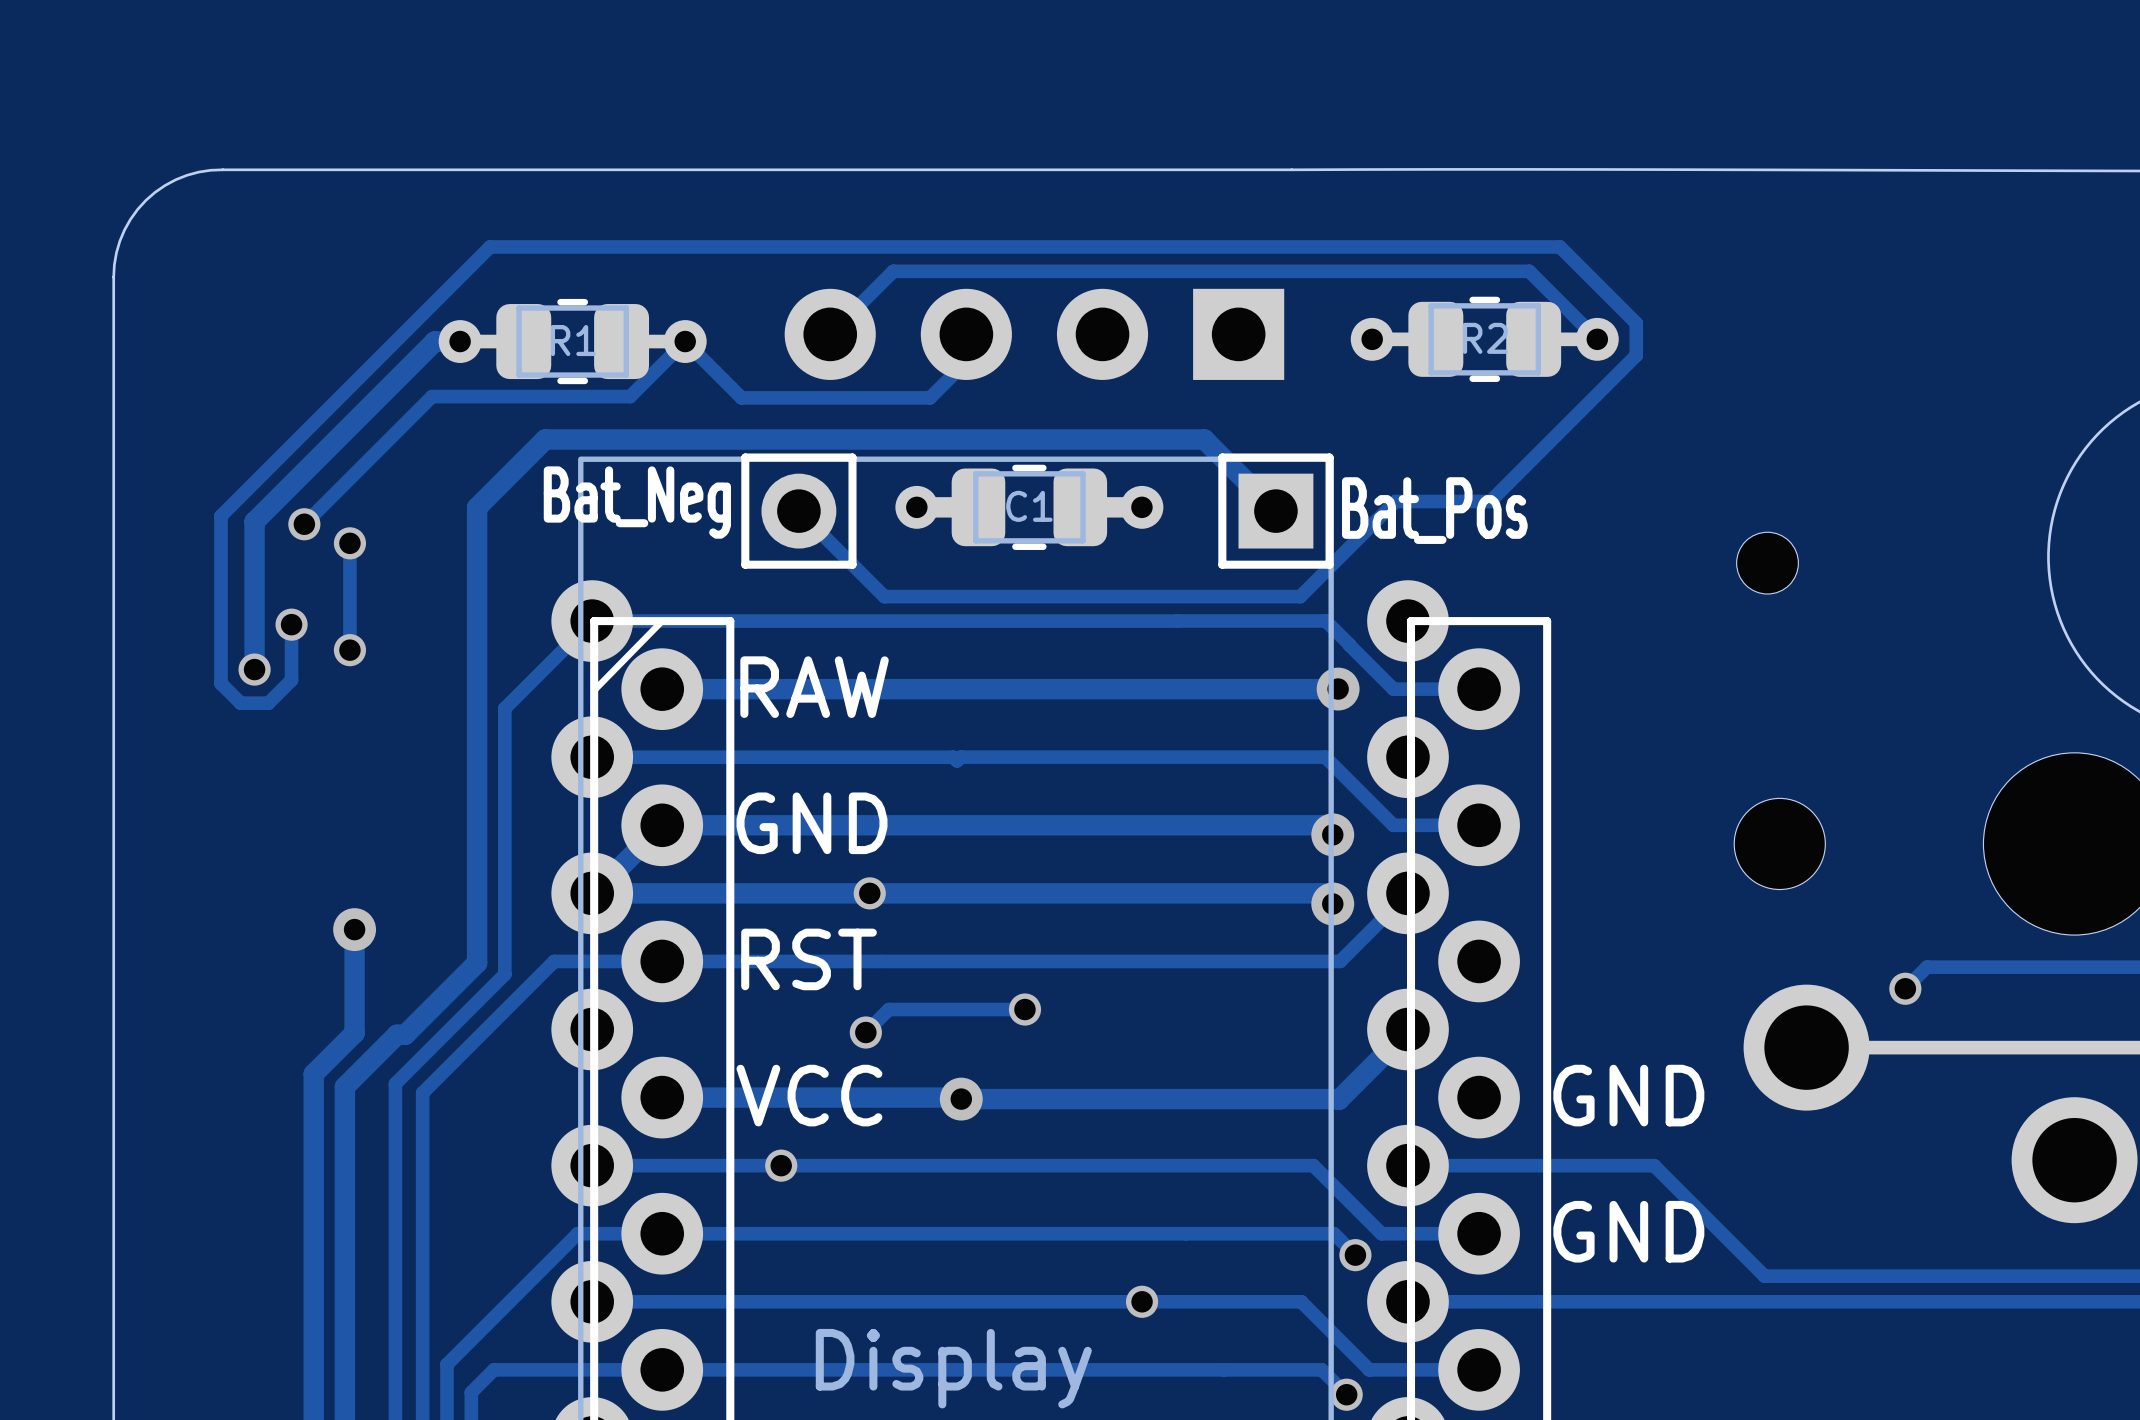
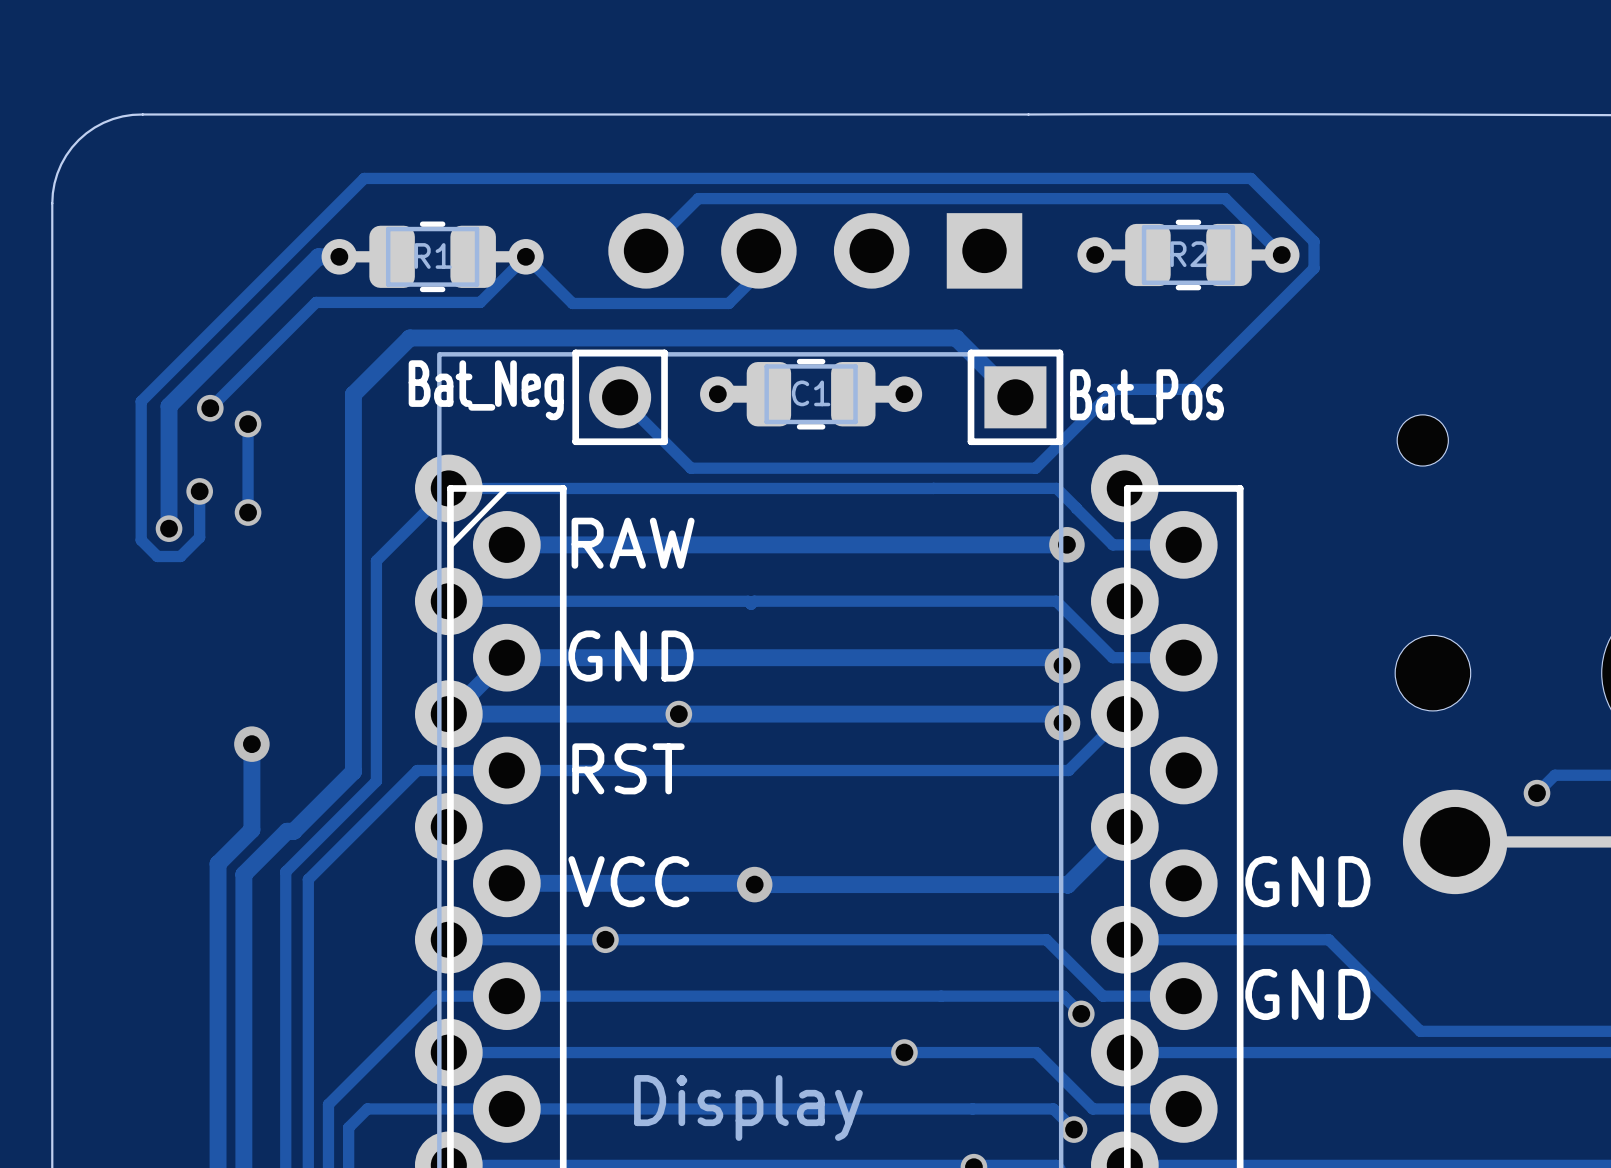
track: (1024, 1009) (888, 1009) (865, 1032) -> none
via: (1024, 1009) -> none
via: (865, 1032) -> none

